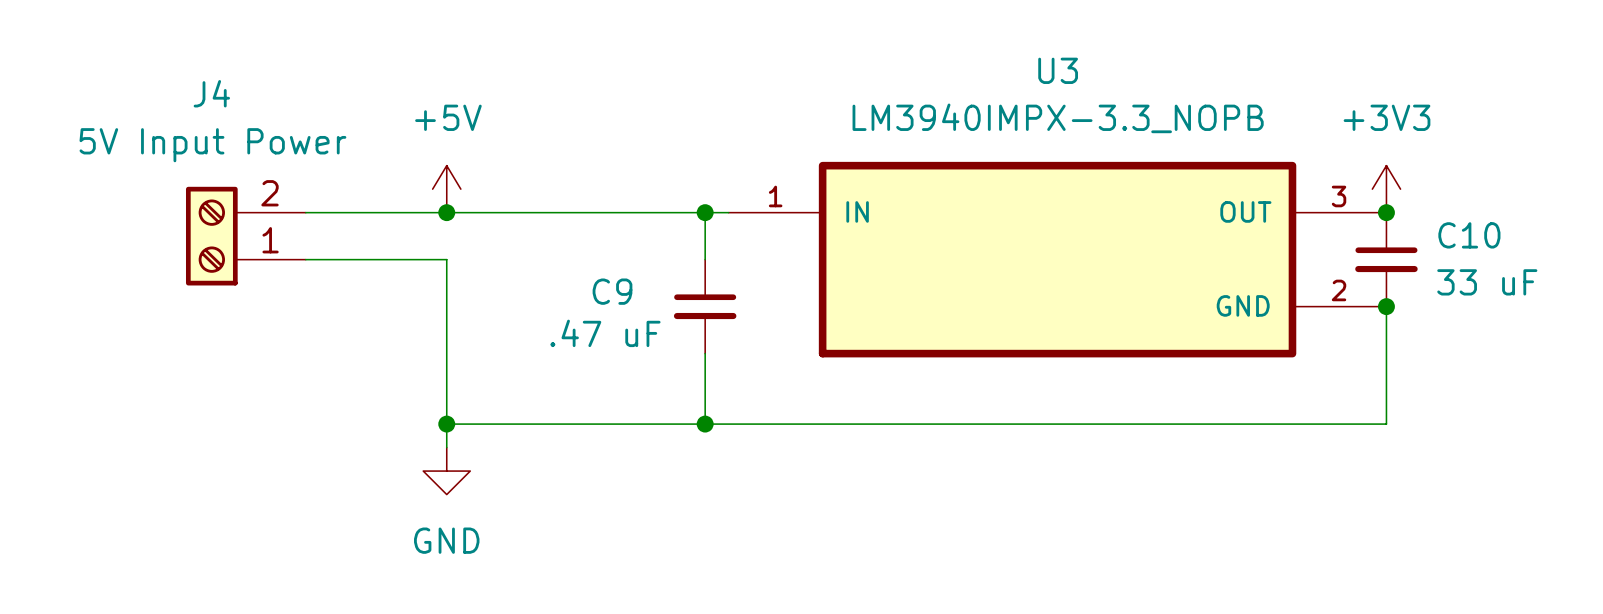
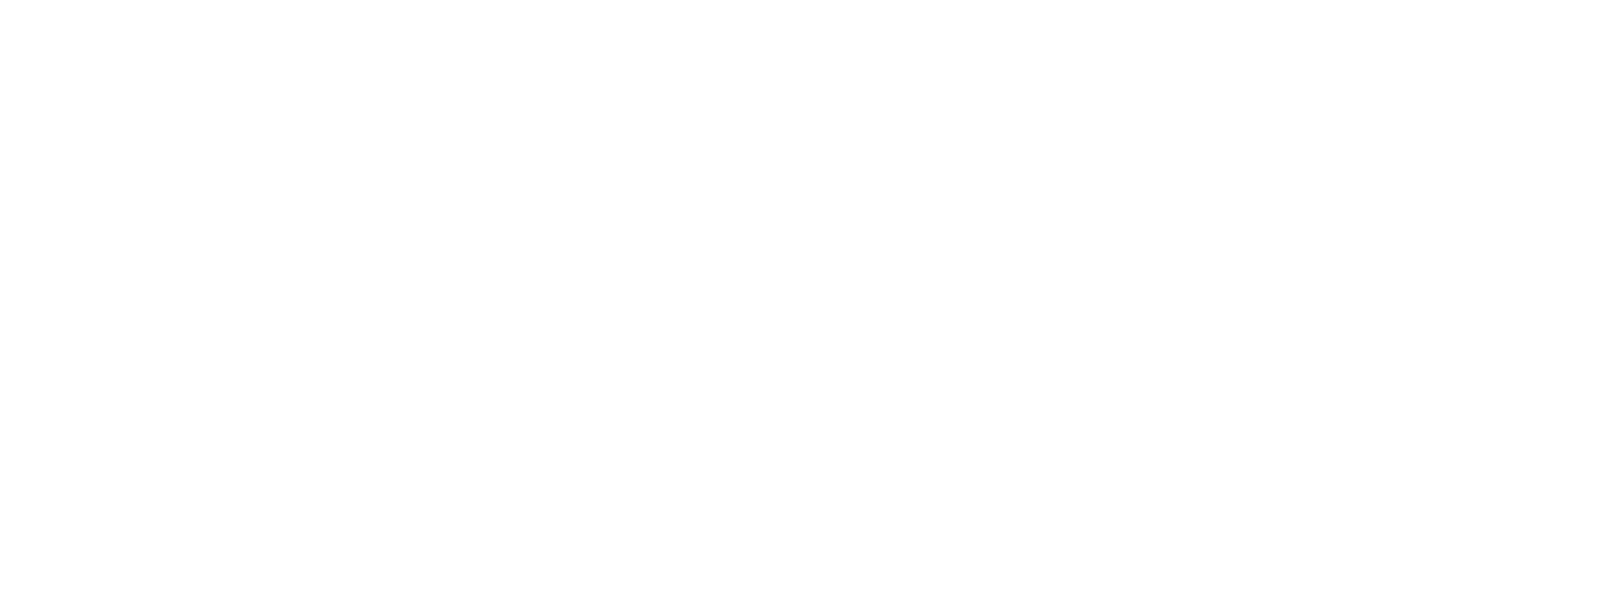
power symbol: +5V (446, 189) -> none
power symbol: +3V3 (1386, 189) -> none
wire: (305, 212) (728, 212) -> none
junction: (446, 212) -> none
wire: (705, 212) (705, 259) -> none
junction: (705, 212) -> none
junction: (1386, 212) -> none
J4: 5V Input Power (245, 236) -> none
wire: (305, 259) (446, 259) (446, 447) -> none
U3: LM3940IMPX-3.3_NOPB (1057, 259) -> none
C10: 33 uF (1386, 259) -> none
C9: .47 uF (705, 306) -> none
wire: (1386, 306) (1386, 424) (446, 424) -> none
junction: (1386, 306) -> none
wire: (705, 353) (705, 424) -> none
junction: (446, 424) -> none
junction: (705, 424) -> none
power symbol: GND (446, 471) -> none

